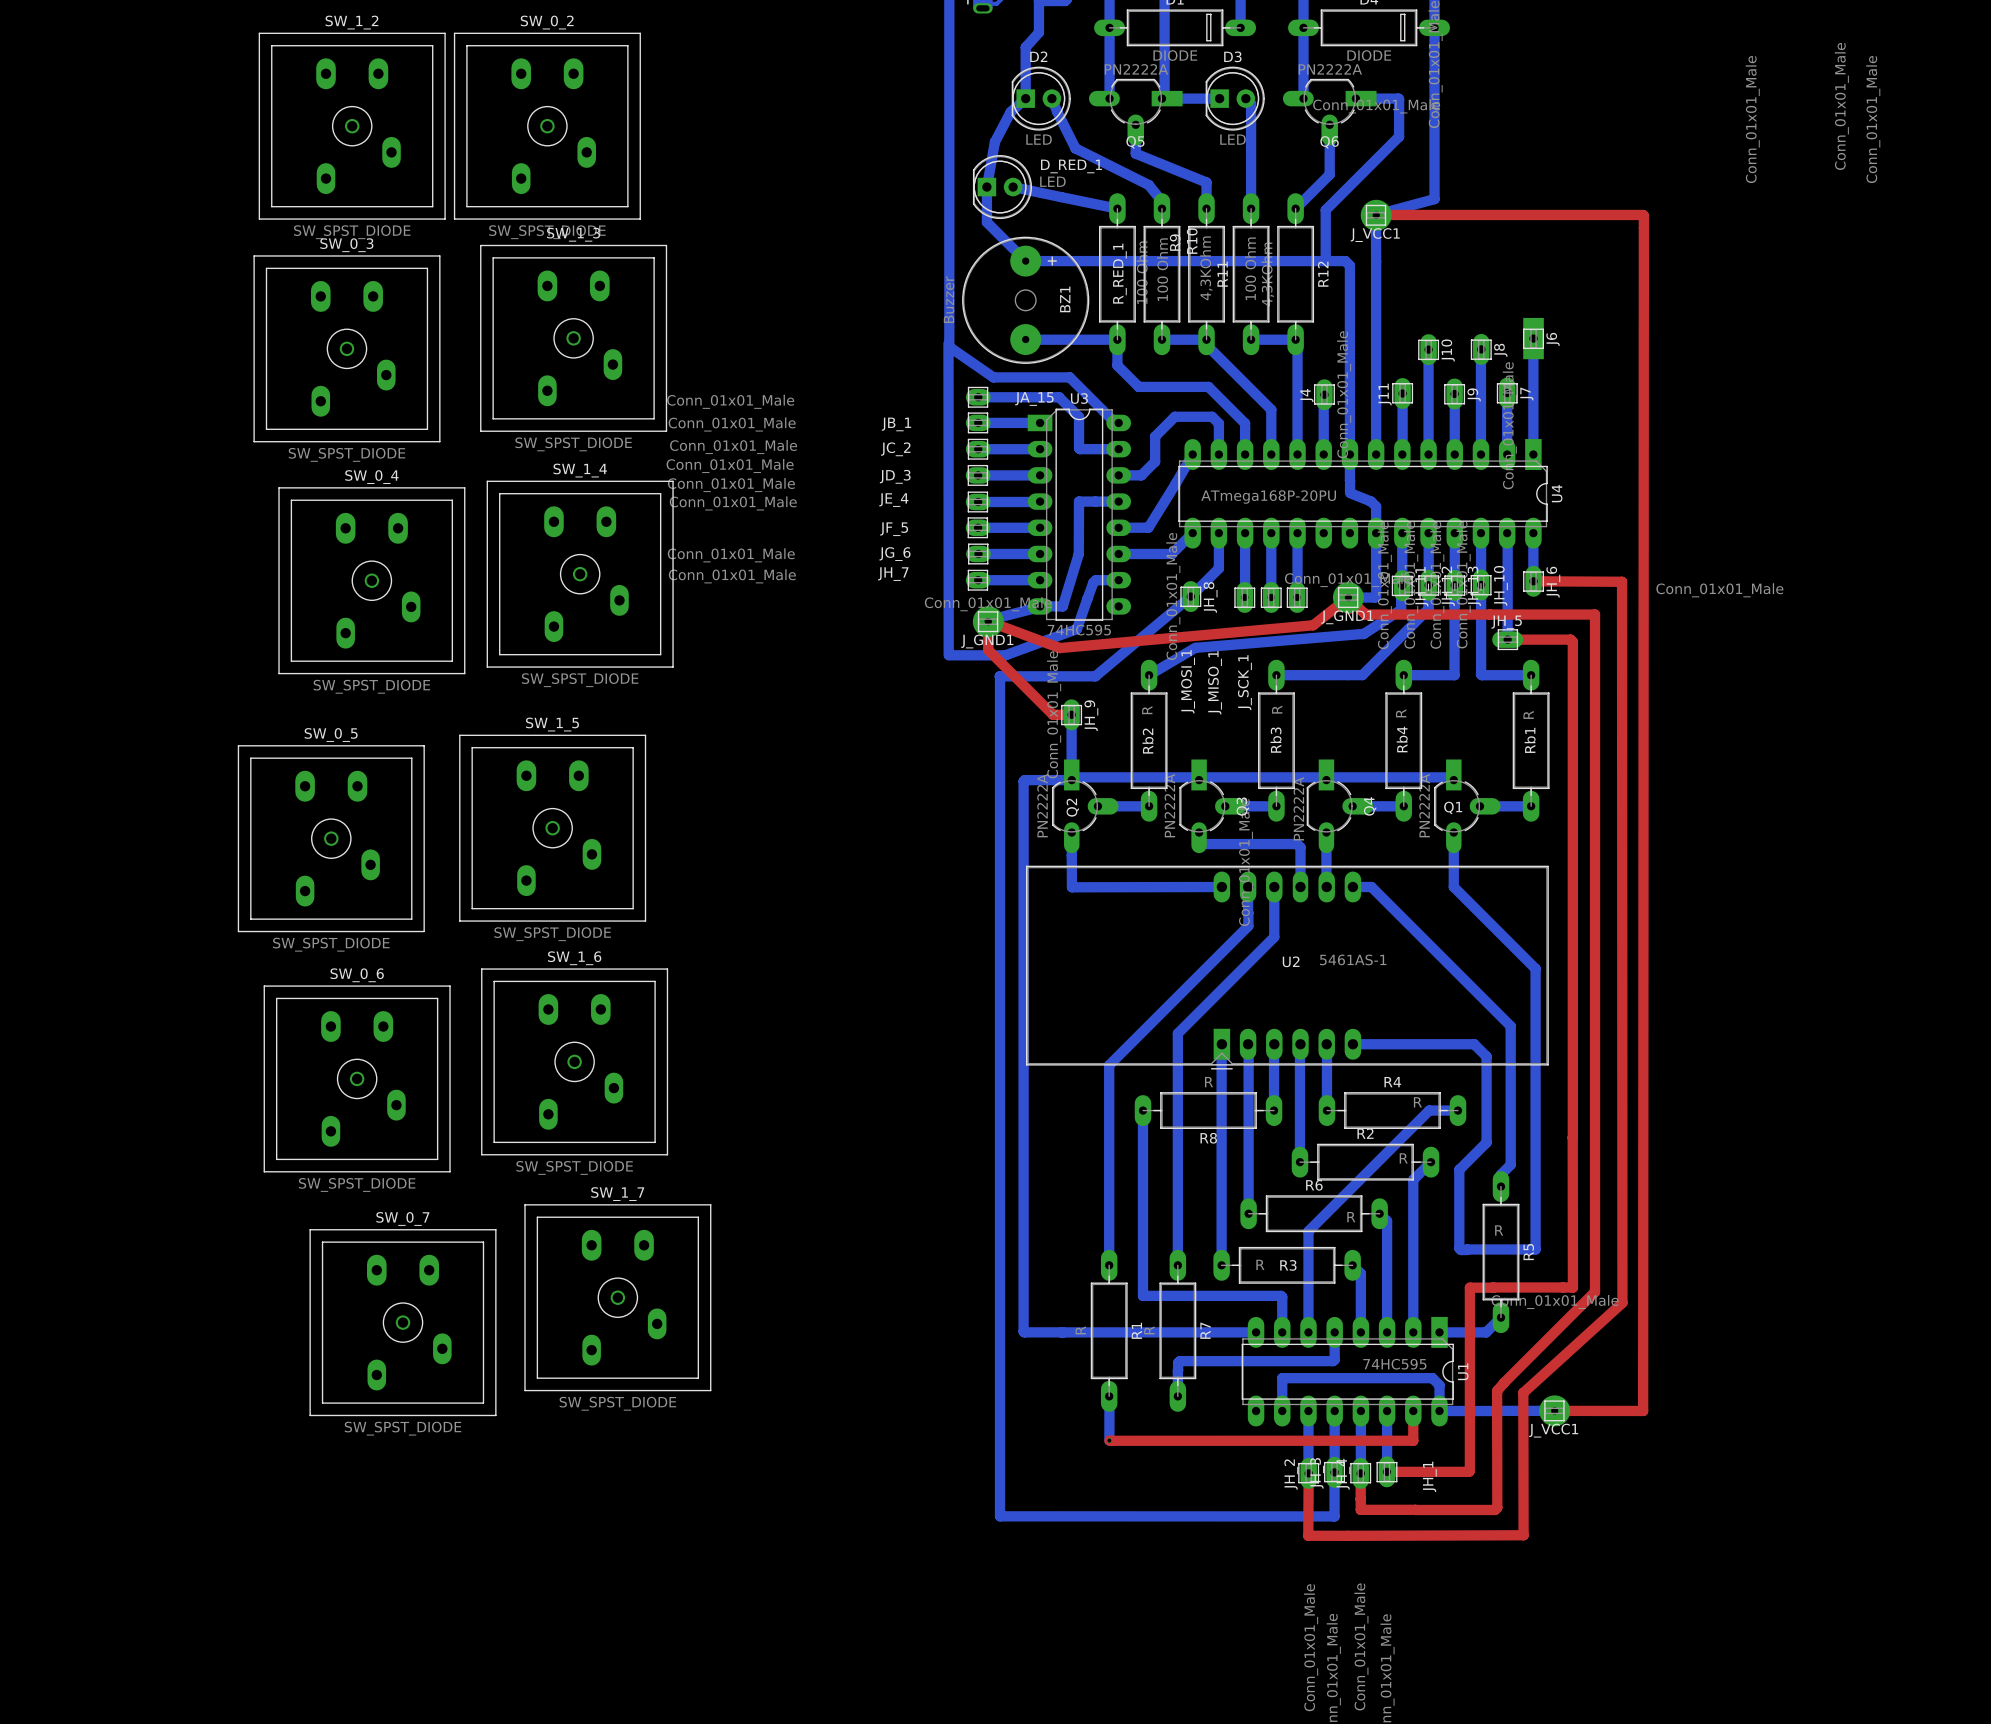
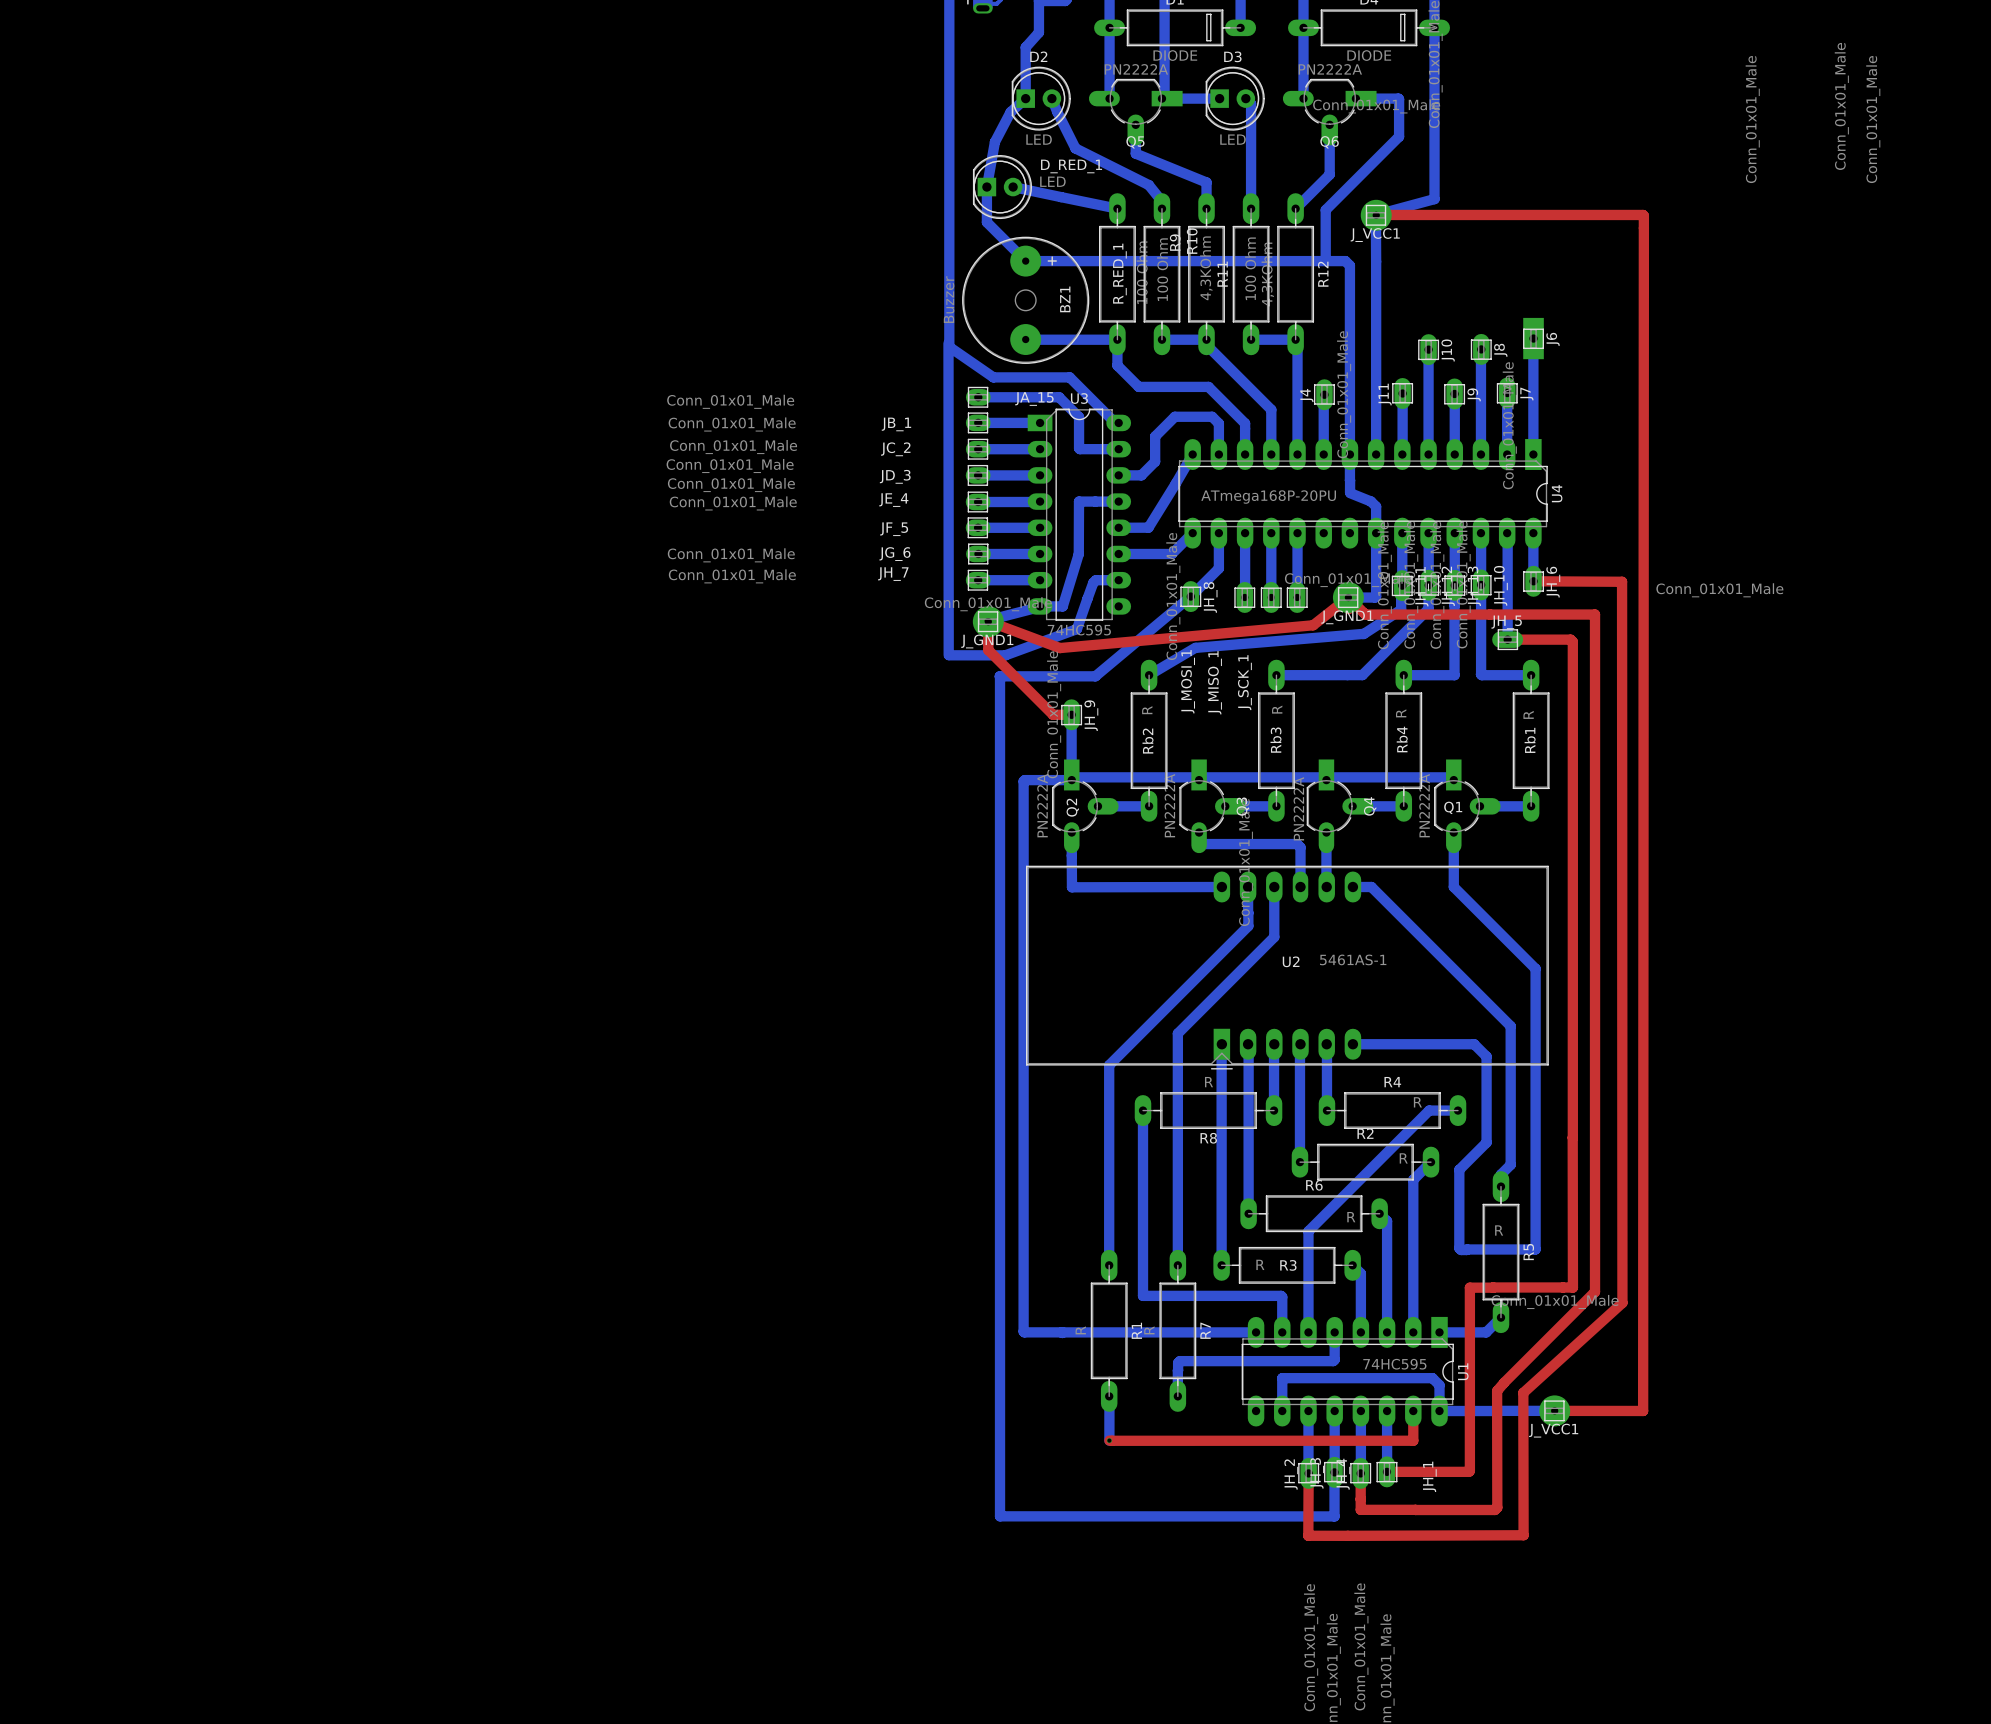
SW_1_2: SW_SPST_DIODE (352, 126) -> none
SW_0_2: SW_SPST_DIODE (547, 126) -> none
SW_1_3: SW_SPST_DIODE (573, 338) -> none
SW_0_3: SW_SPST_DIODE (346, 348) -> none
SW_1_4: SW_SPST_DIODE (580, 574) -> none
SW_0_4: SW_SPST_DIODE (371, 580) -> none
SW_1_5: SW_SPST_DIODE (552, 828) -> none
SW_0_5: SW_SPST_DIODE (331, 838) -> none
SW_1_6: SW_SPST_DIODE (574, 1061) -> none
SW_0_6: SW_SPST_DIODE (357, 1078) -> none
SW_1_7: SW_SPST_DIODE (617, 1297) -> none
SW_0_7: SW_SPST_DIODE (403, 1322) -> none

